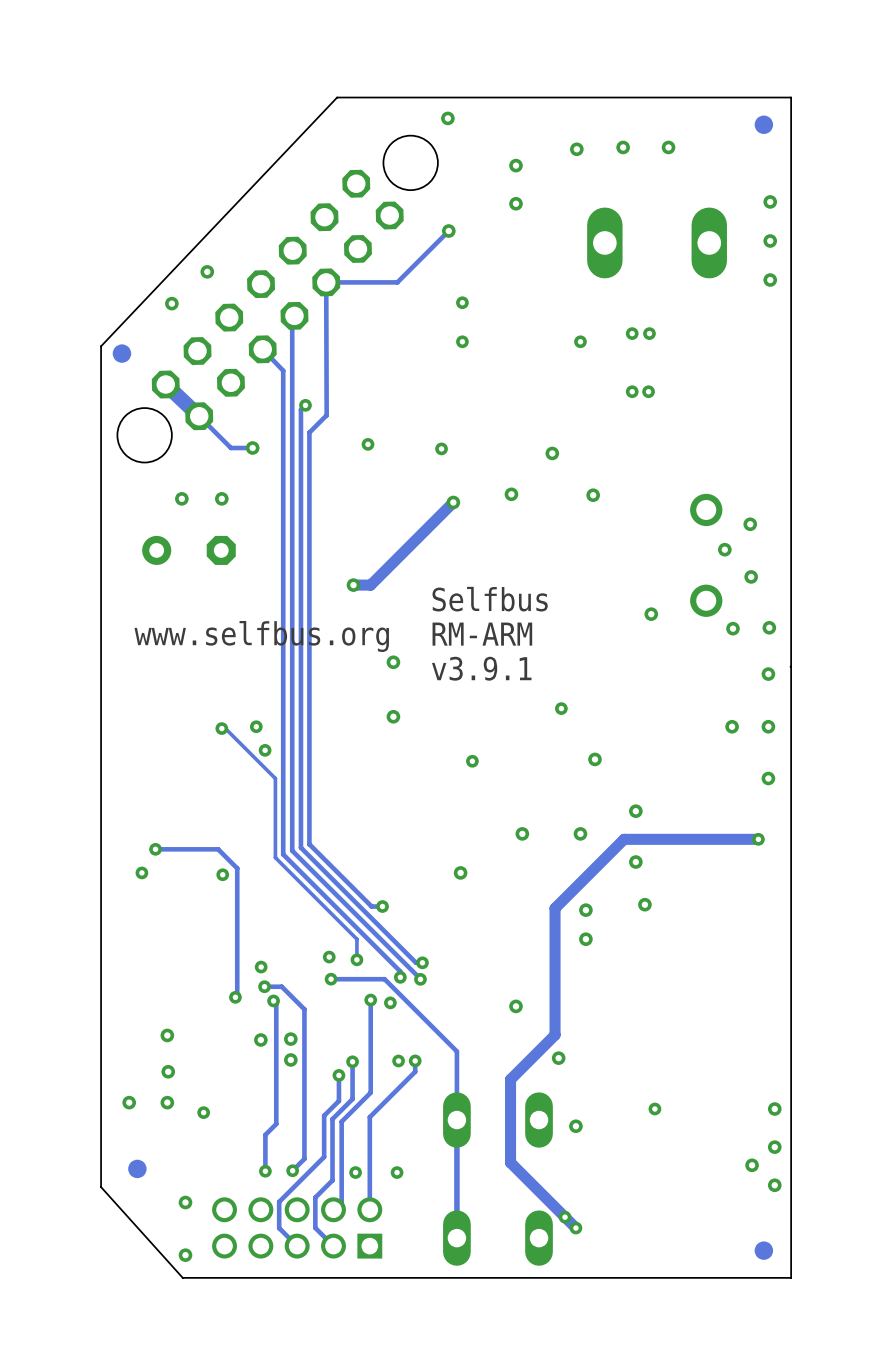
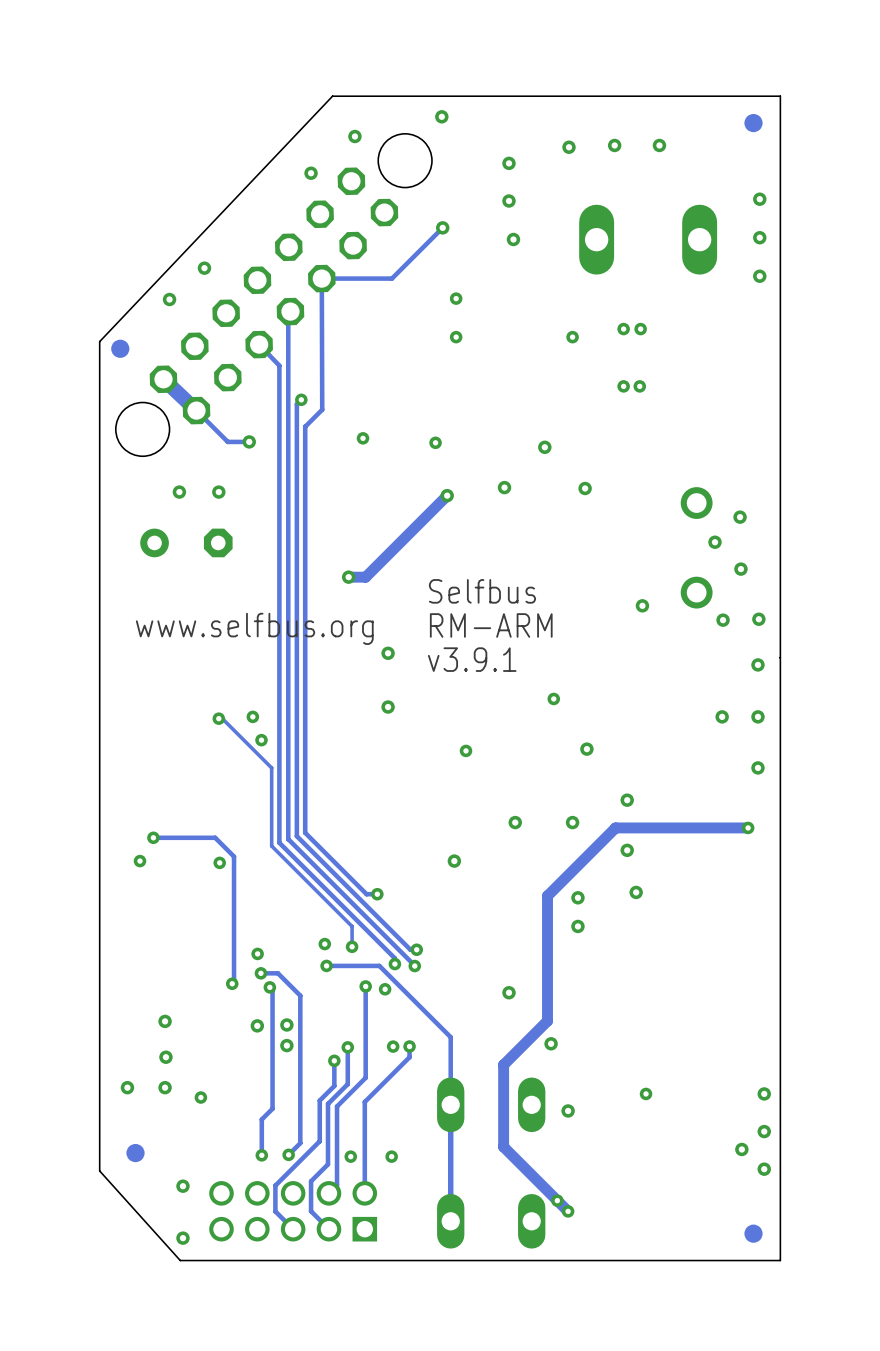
via: none -> (354, 136)
via: none -> (311, 173)
via: none -> (513, 239)

